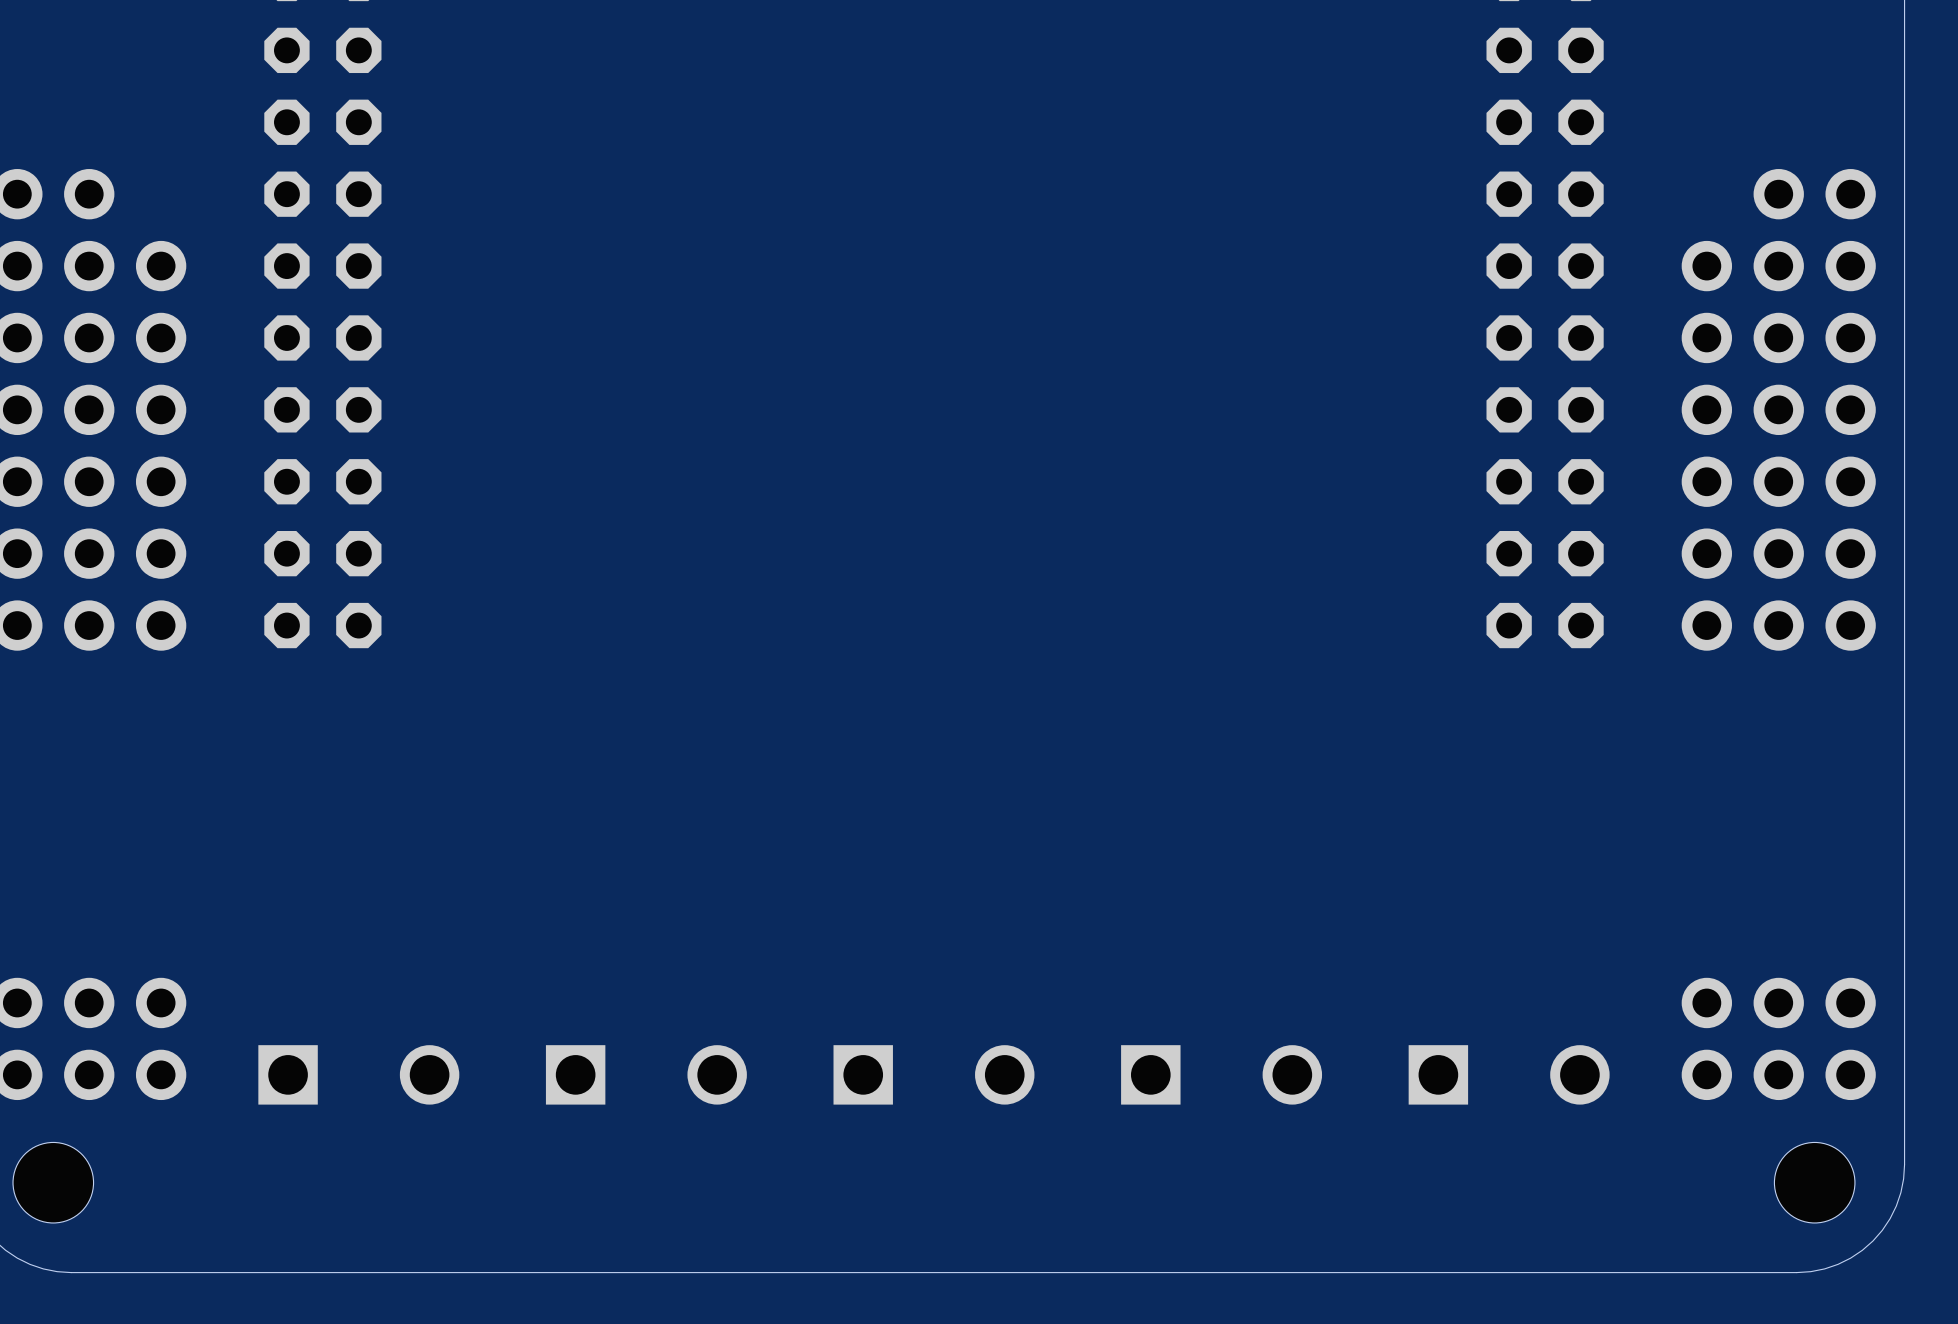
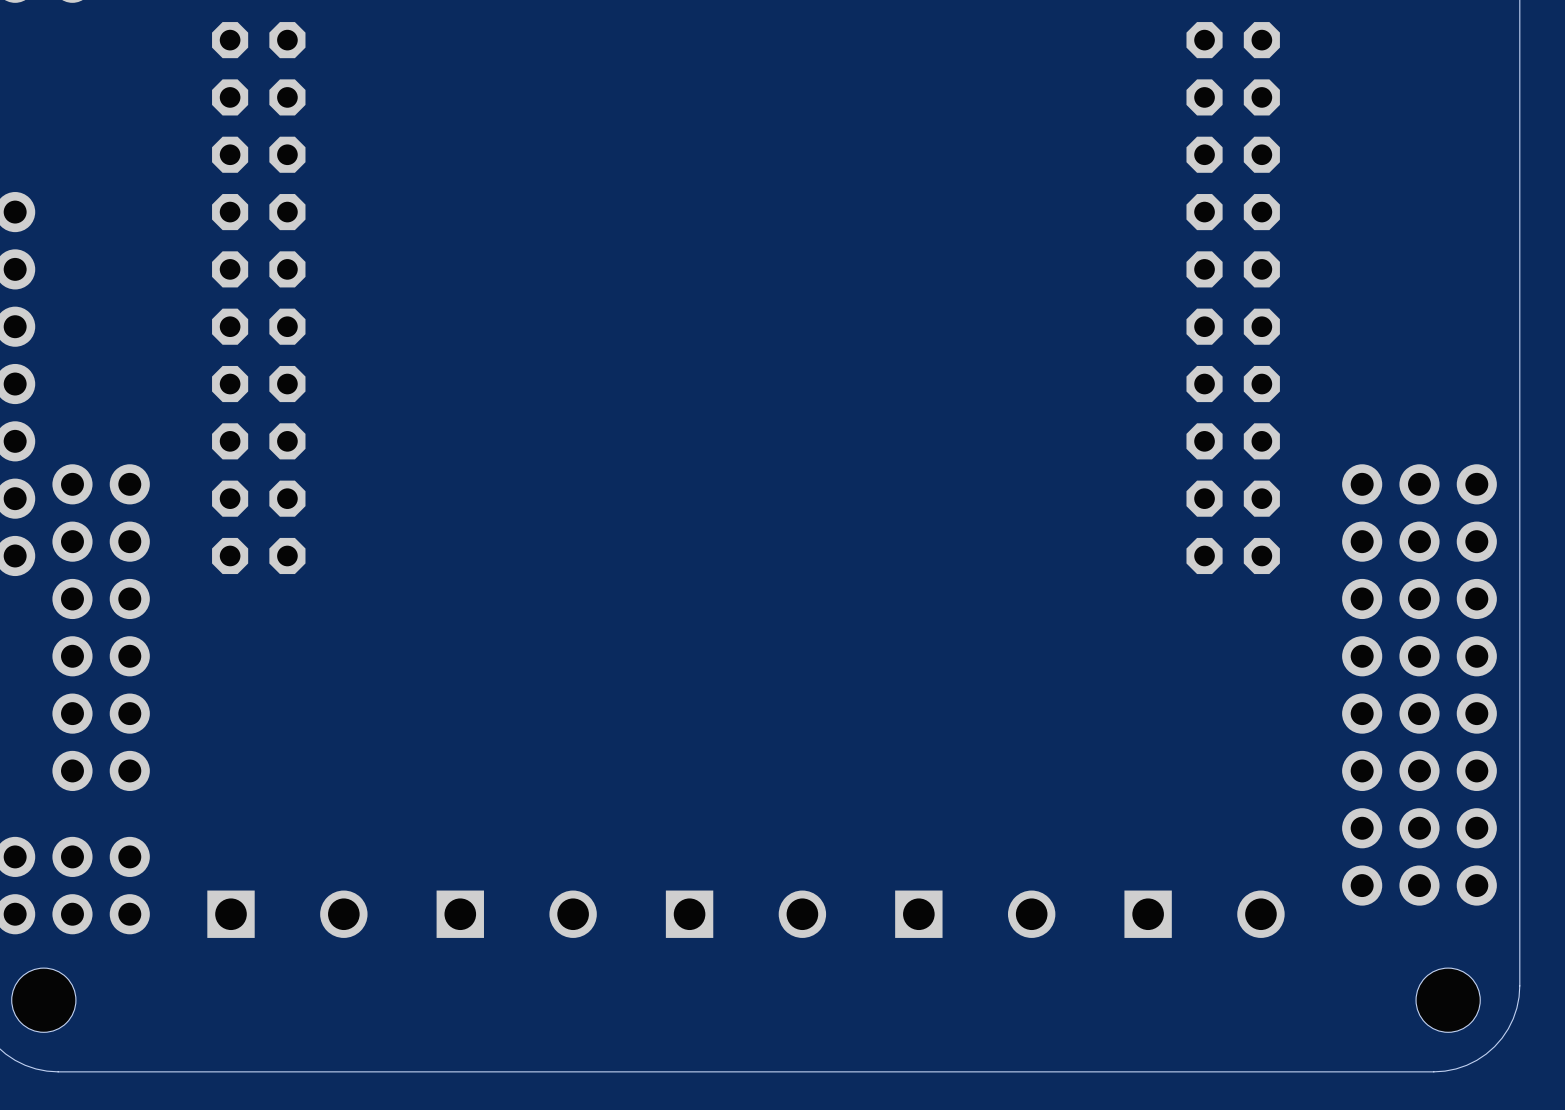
part: (89, 409) -> none
part: (1778, 409) -> none
part: (1850, 409) -> none
part: (161, 445) -> none
part: (1706, 445) -> none
part: none -> (72, 627)
part: none -> (129, 627)
part: none -> (1362, 627)
part: none -> (1419, 627)
part: none -> (1476, 627)
part position: (1778, 1038) -> (1419, 856)

